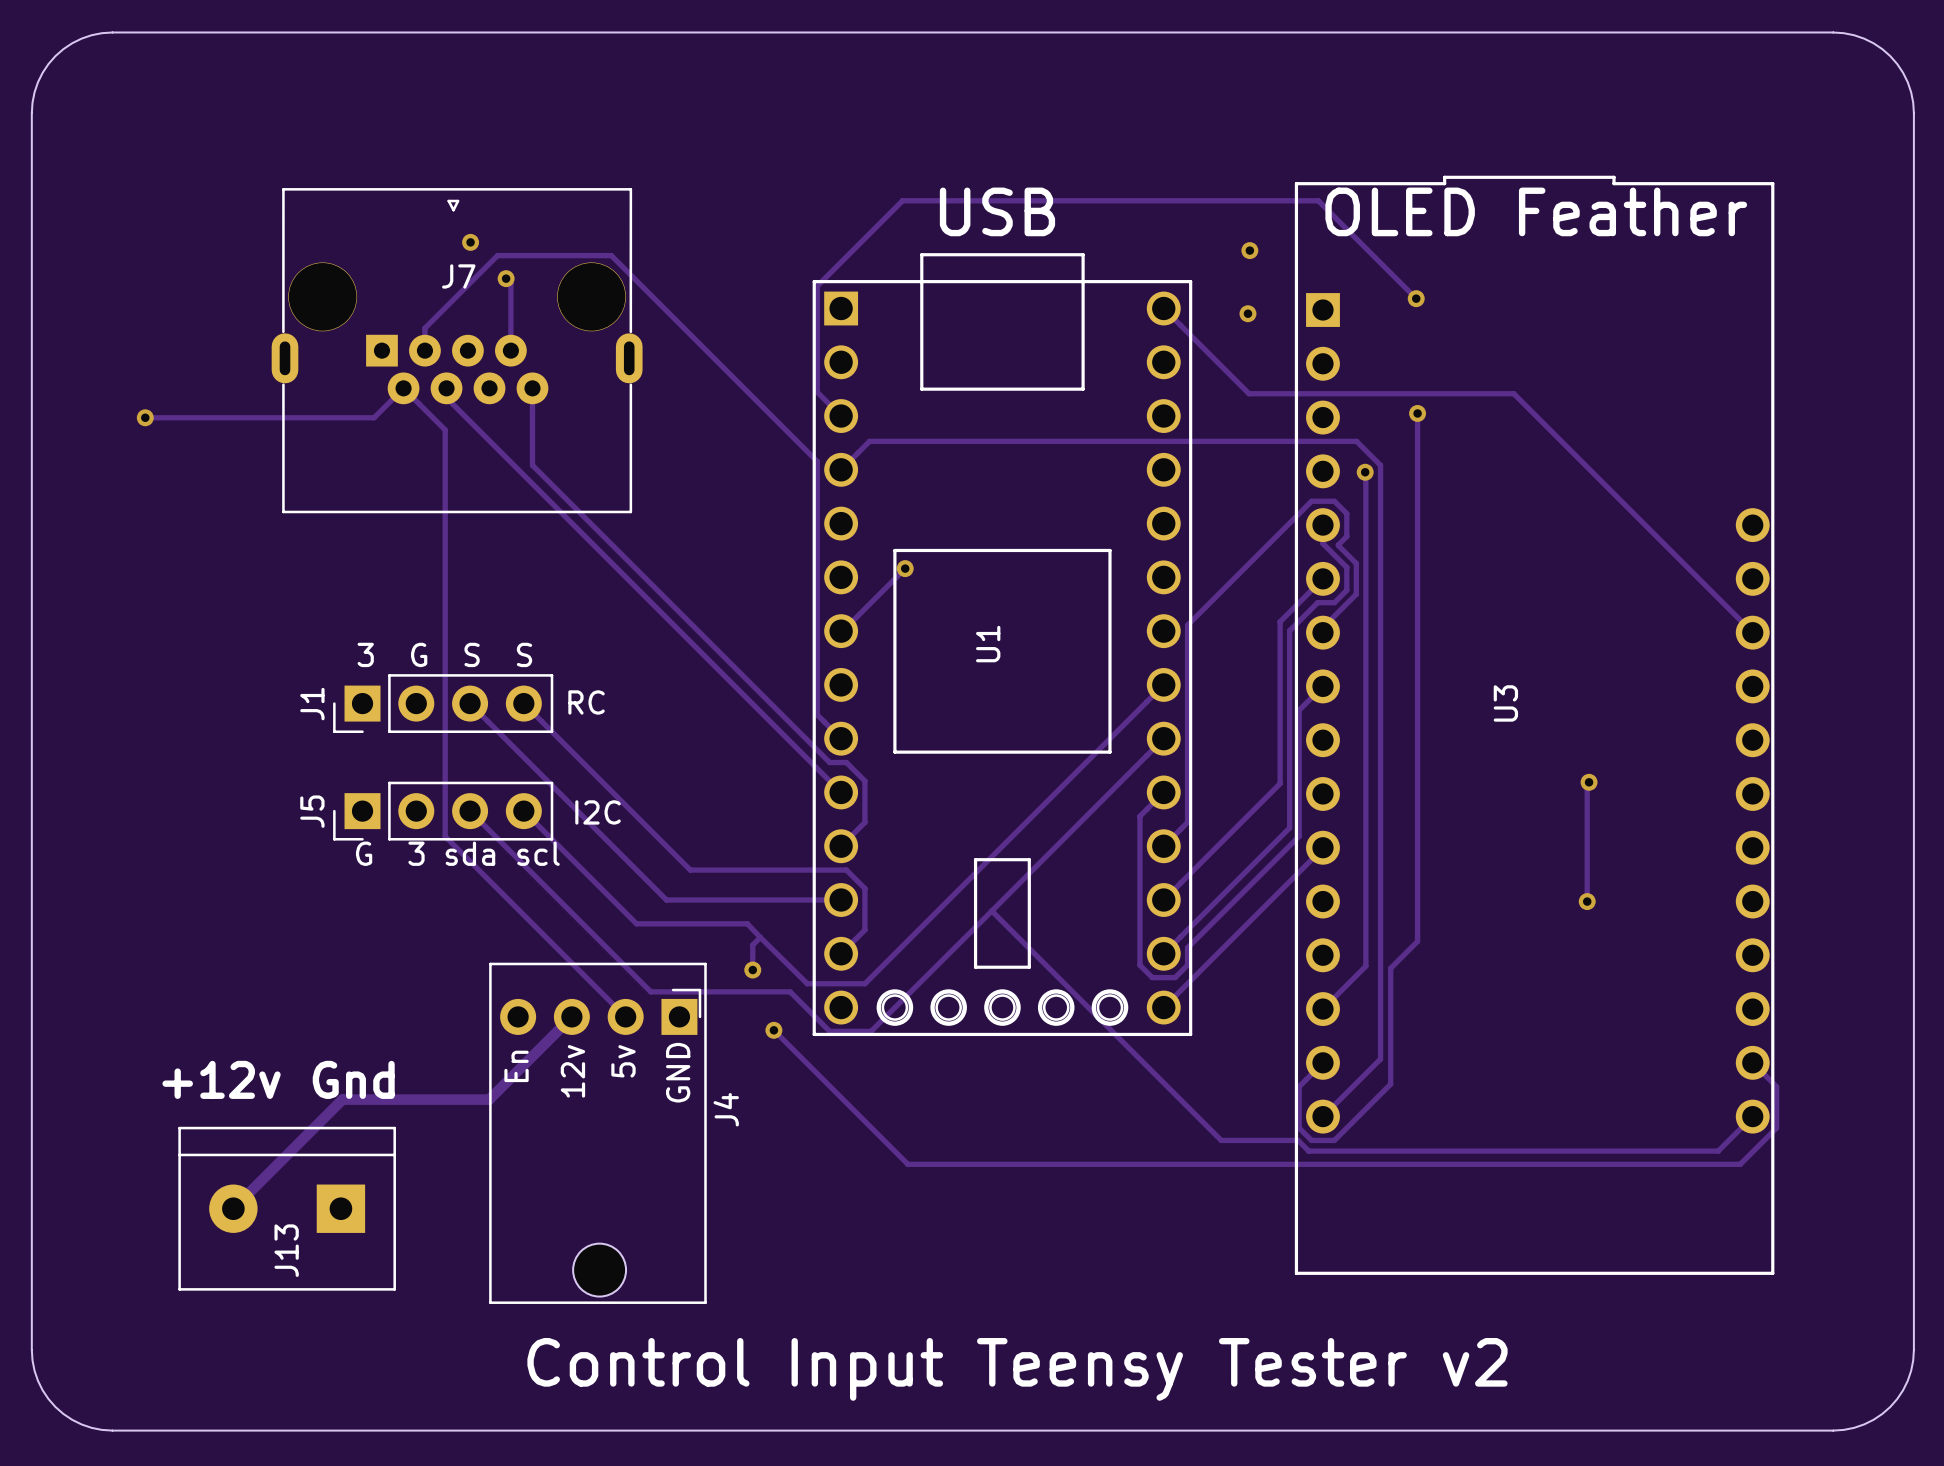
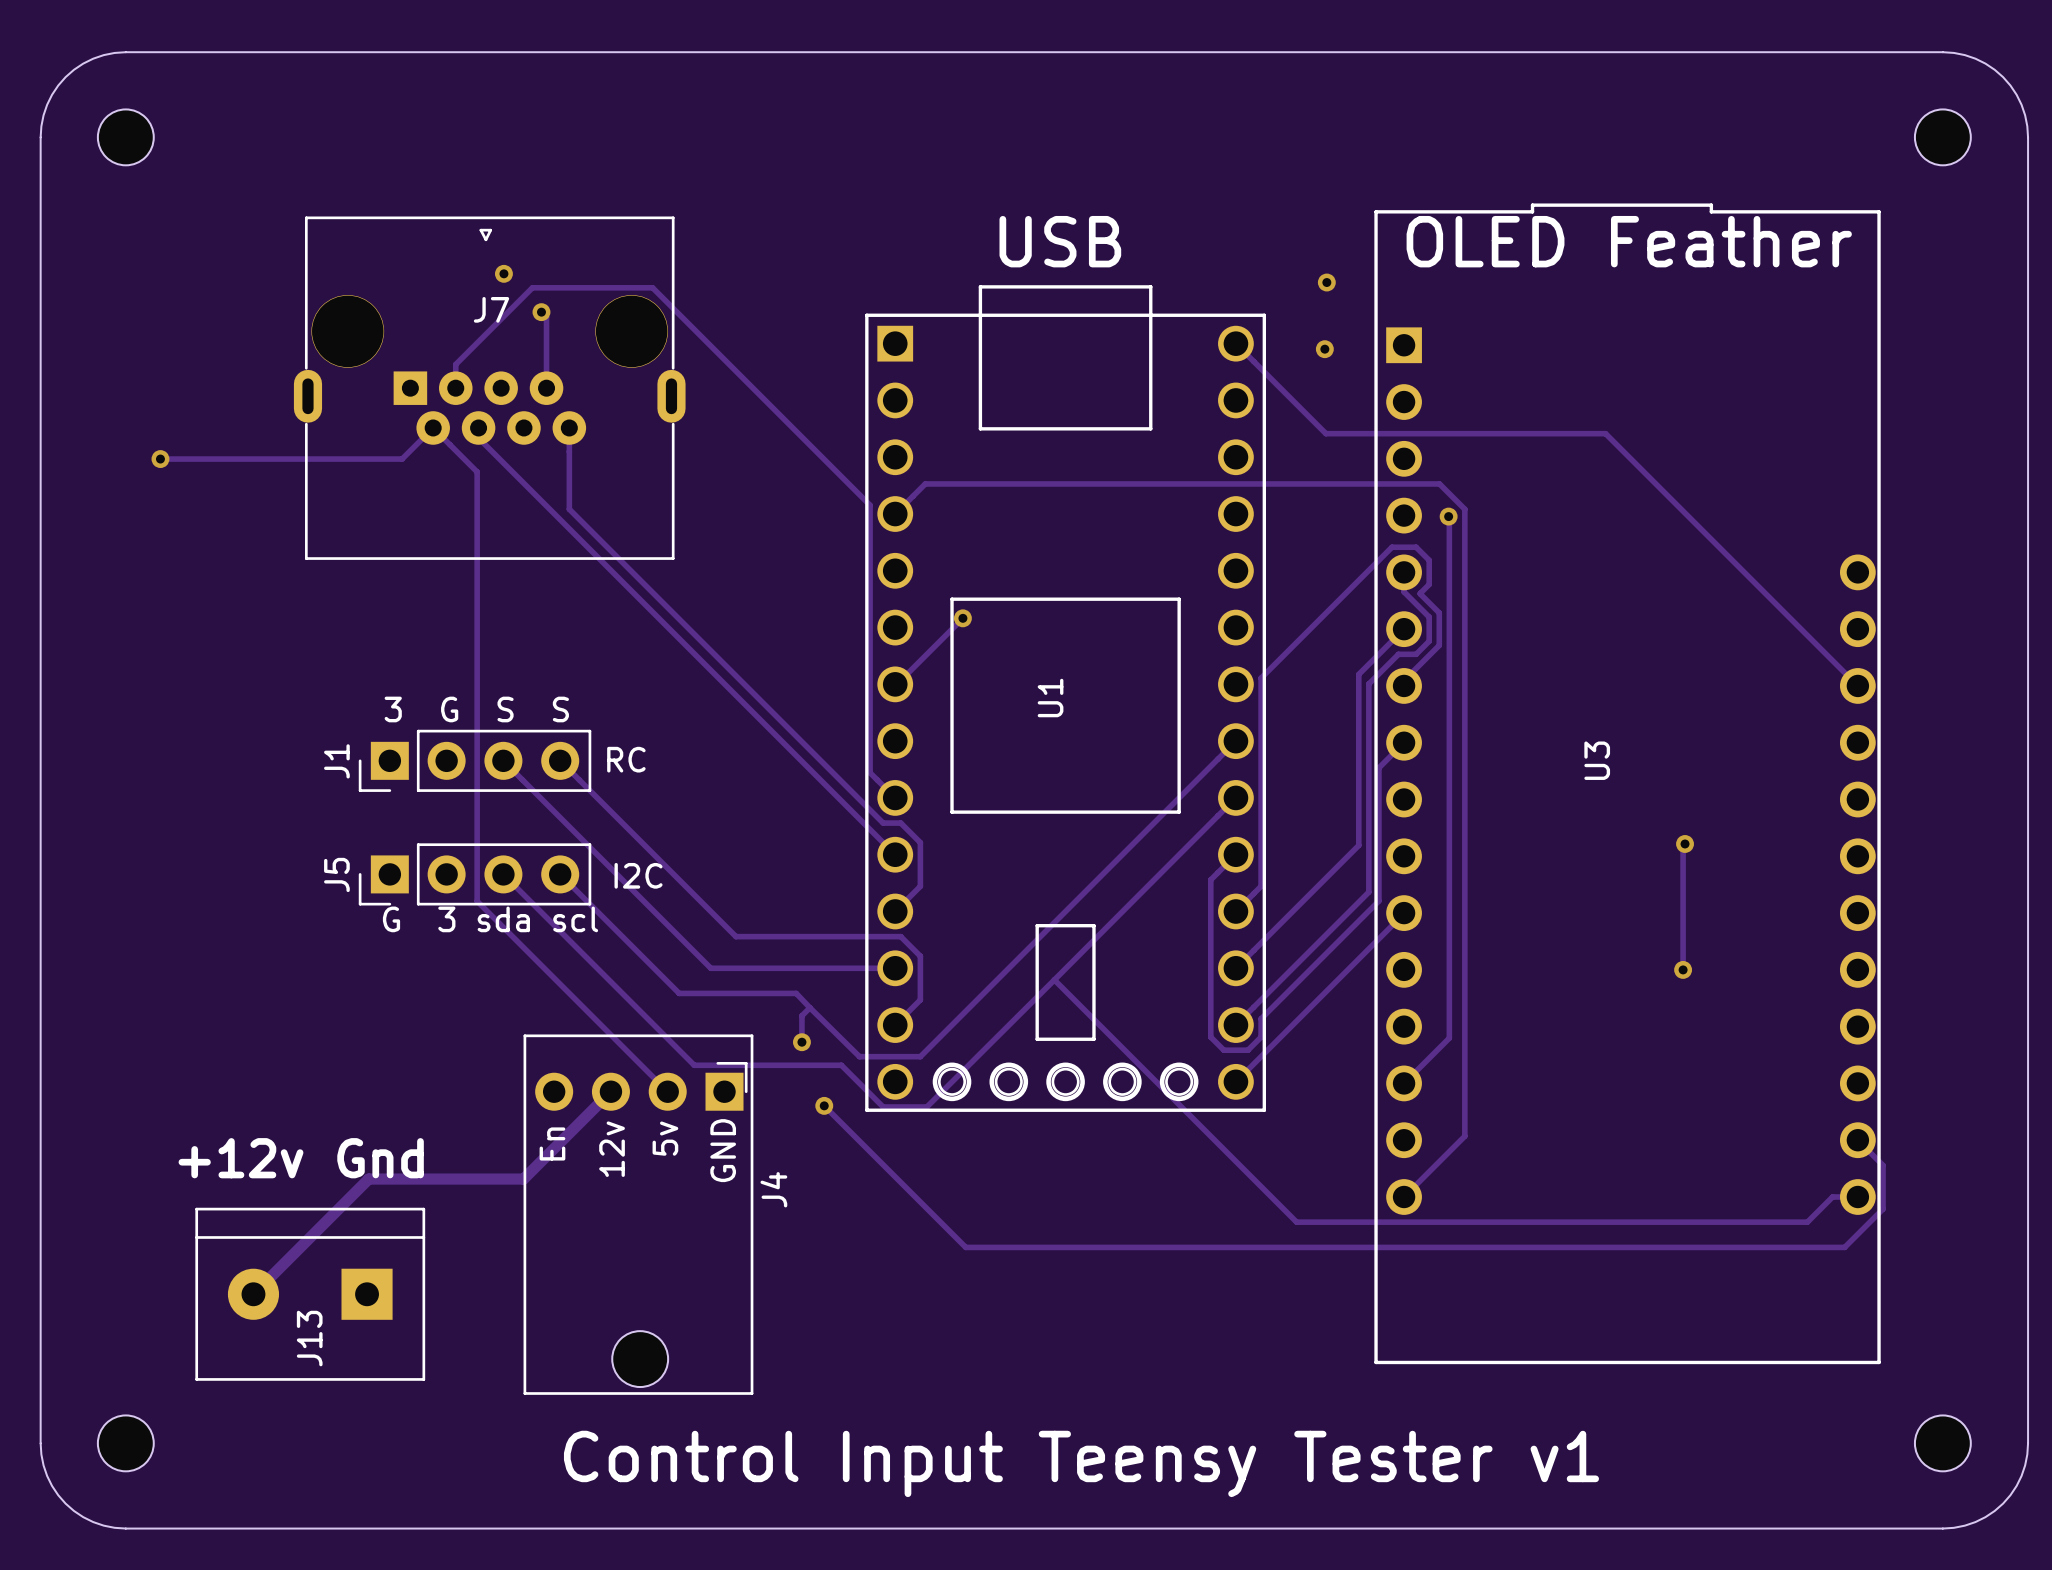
part: none -> (125, 137)
part: none -> (1942, 137)
track: (1416, 298) (1318, 200) (902, 200) (817, 286) (817, 392) (841, 416) -> none
via: (1416, 298) -> none
track: (1417, 413) (1417, 941) (1390, 968) (1390, 1084) (1334, 1140) -> none
via: (1417, 413) -> none
track: (1322, 1062) (1299, 1086) (1299, 1128) (1311, 1140) -> (1377, 1222) (1391, 1222)
track: (1752, 1116) (1718, 1151) (1308, 1151) (1298, 1140) -> (1857, 1197) (1832, 1197) (1807, 1222) (1416, 1222)
part: none -> (125, 1443)
part: none -> (1942, 1443)
text: Control Input Teensy Tester v2 (1017, 1369) -> Control Input Teensy Tester v1 (1081, 1463)

